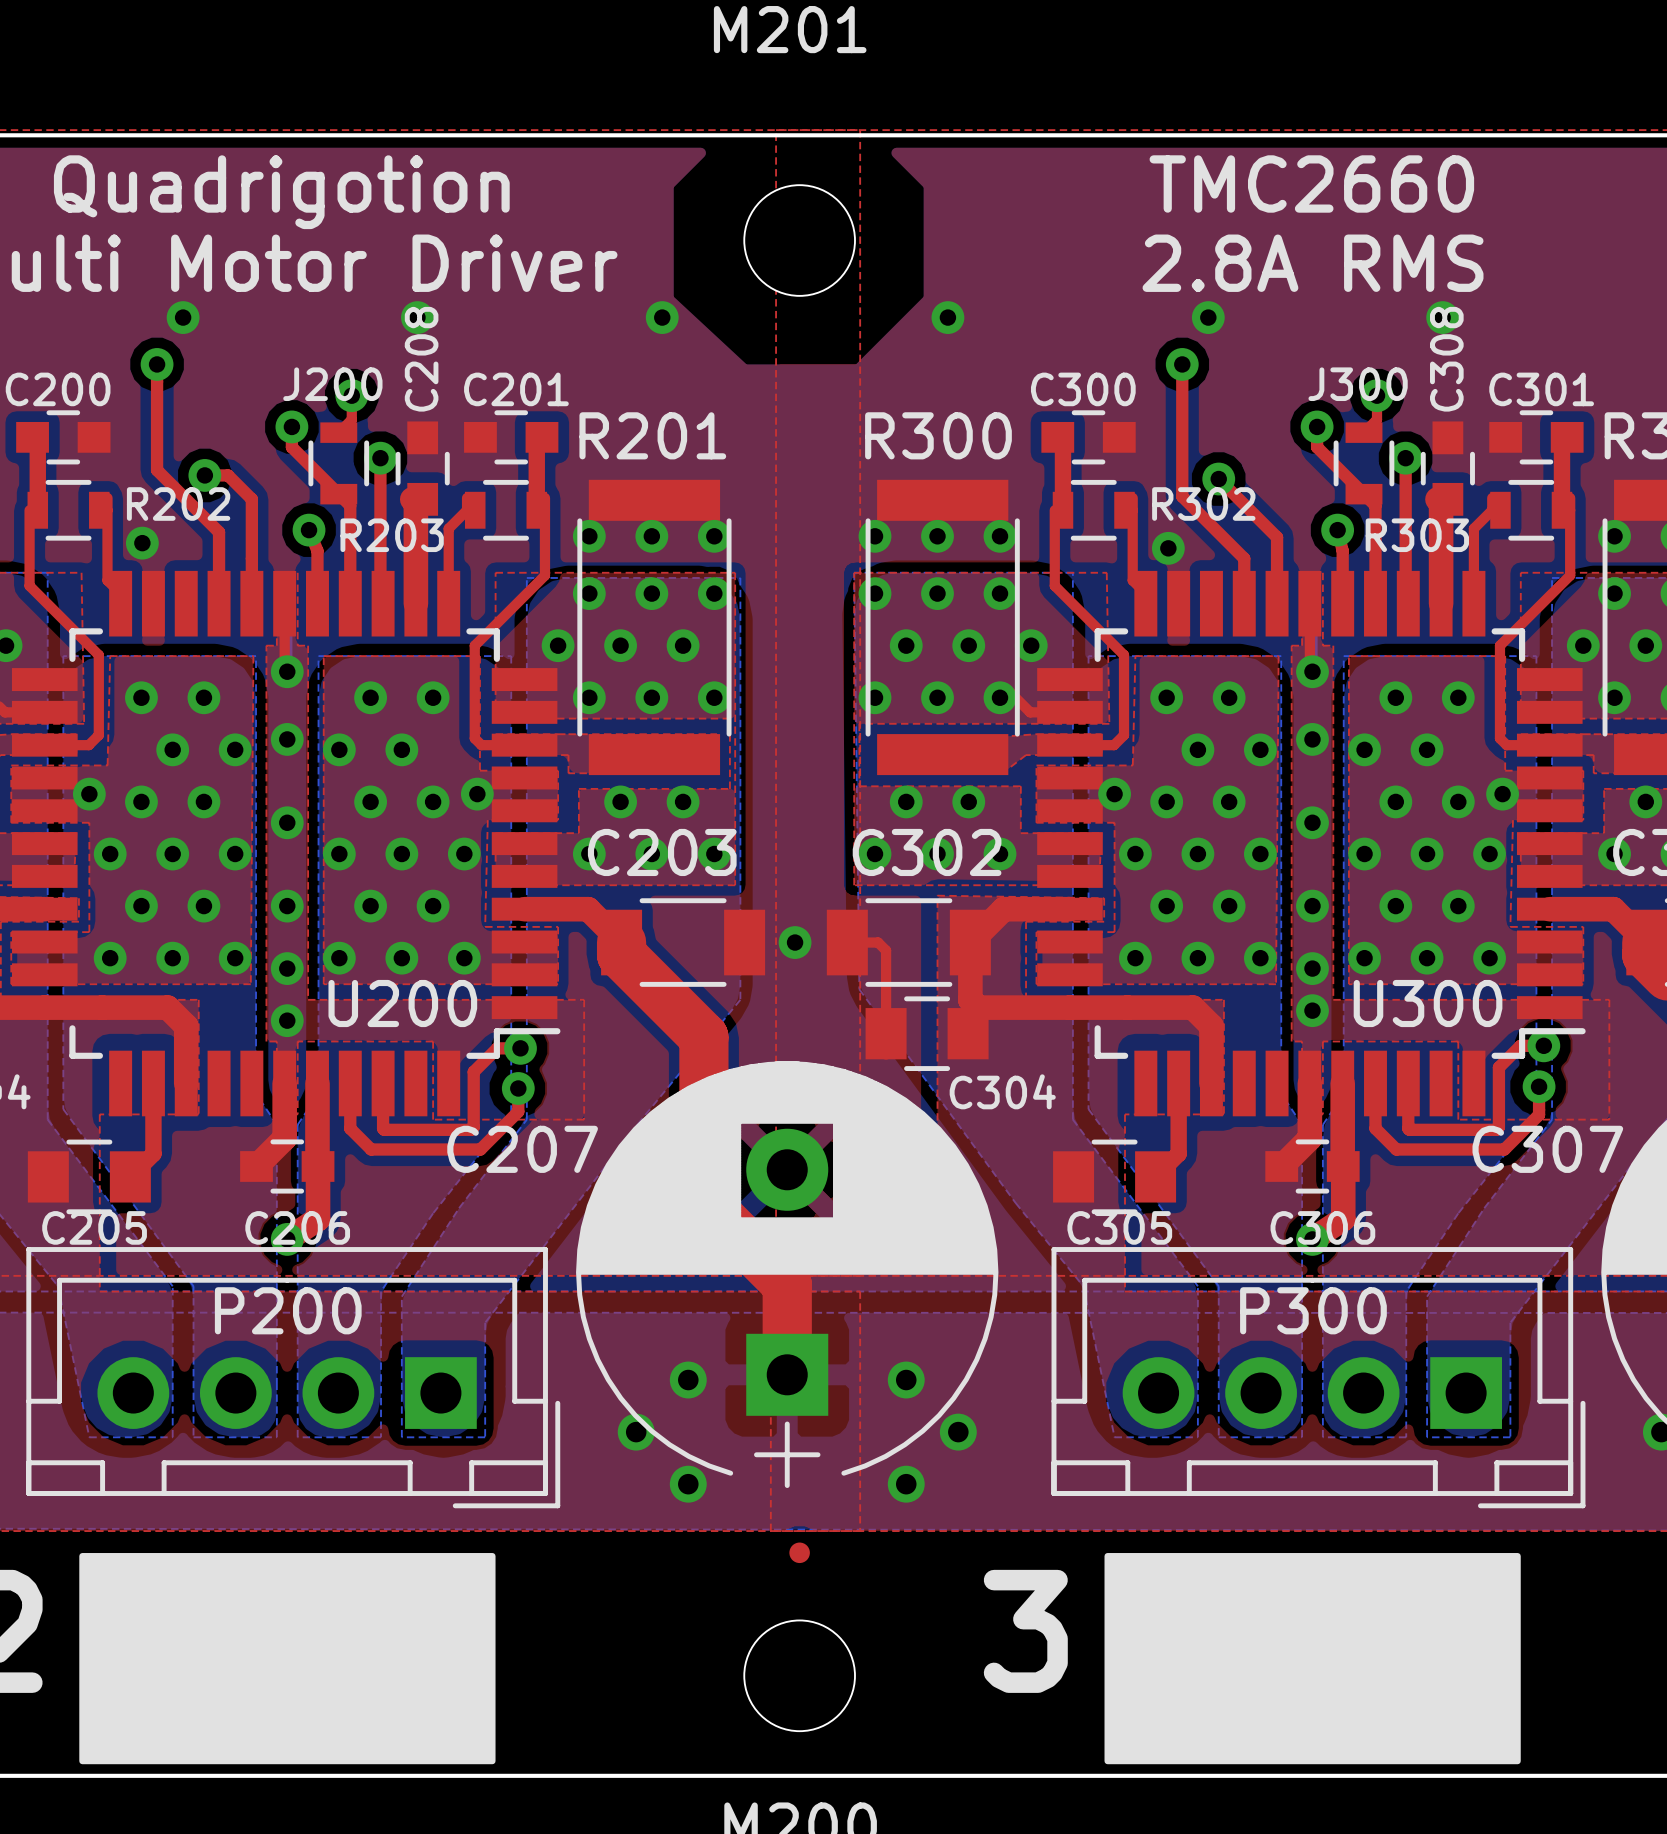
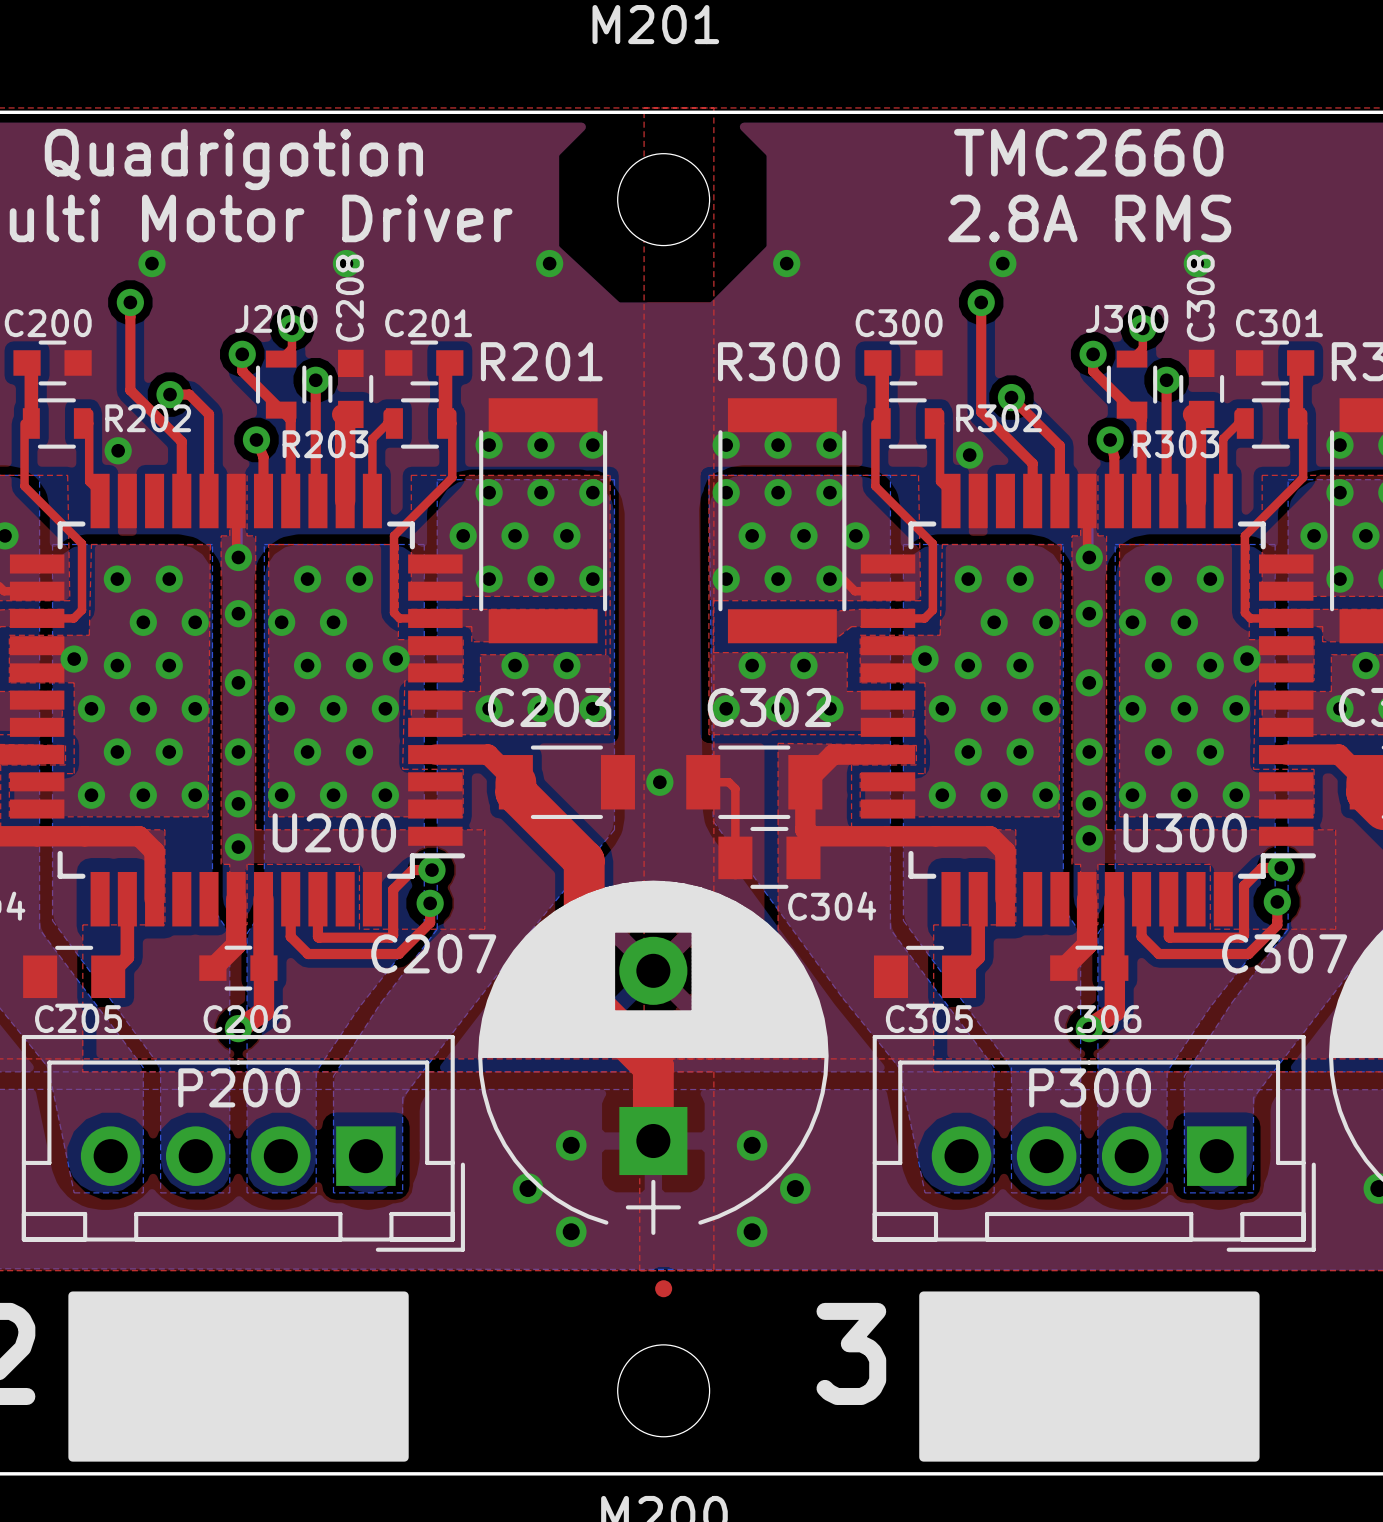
drawing shape: [79, 1553, 496, 1765] -> [68, 1291, 409, 1462]
drawing shape: [1104, 1553, 1521, 1765] -> [919, 1291, 1260, 1462]

